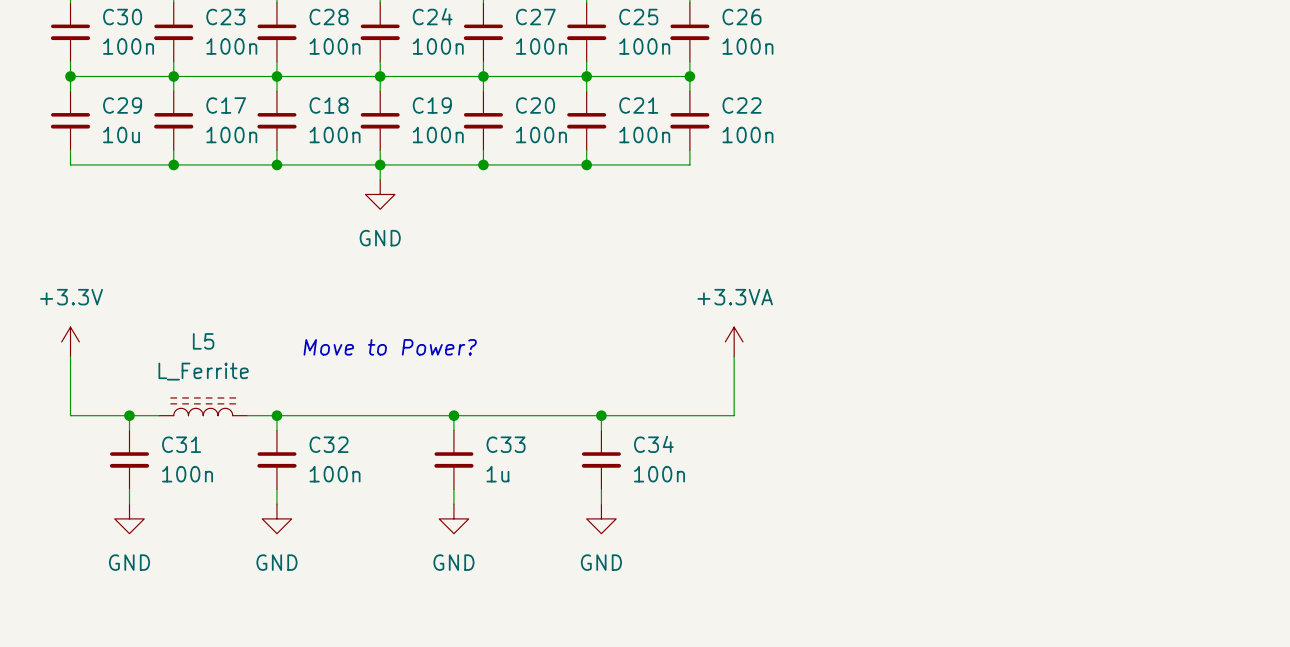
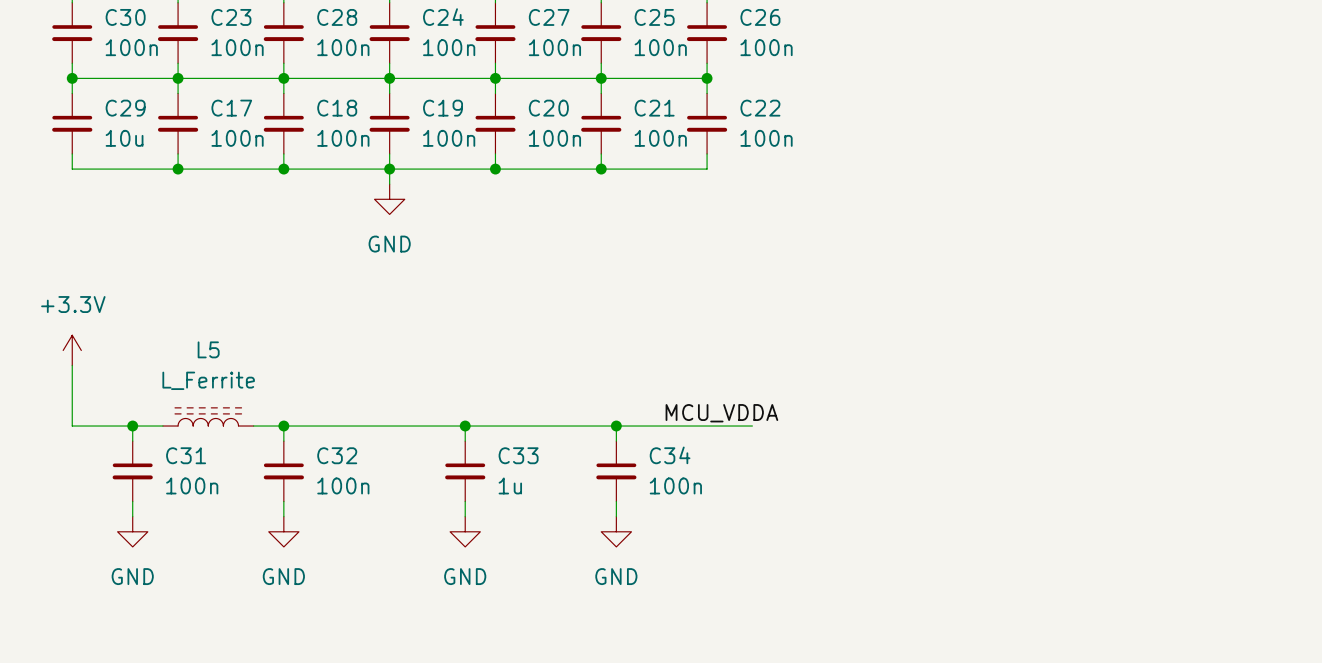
power symbol: +3.3VA (734, 341) -> none
text: Move to Power? (390, 347) -> none
wire: (734, 356) (734, 415) -> none
label: none -> MCU_VDDA (721, 413)

